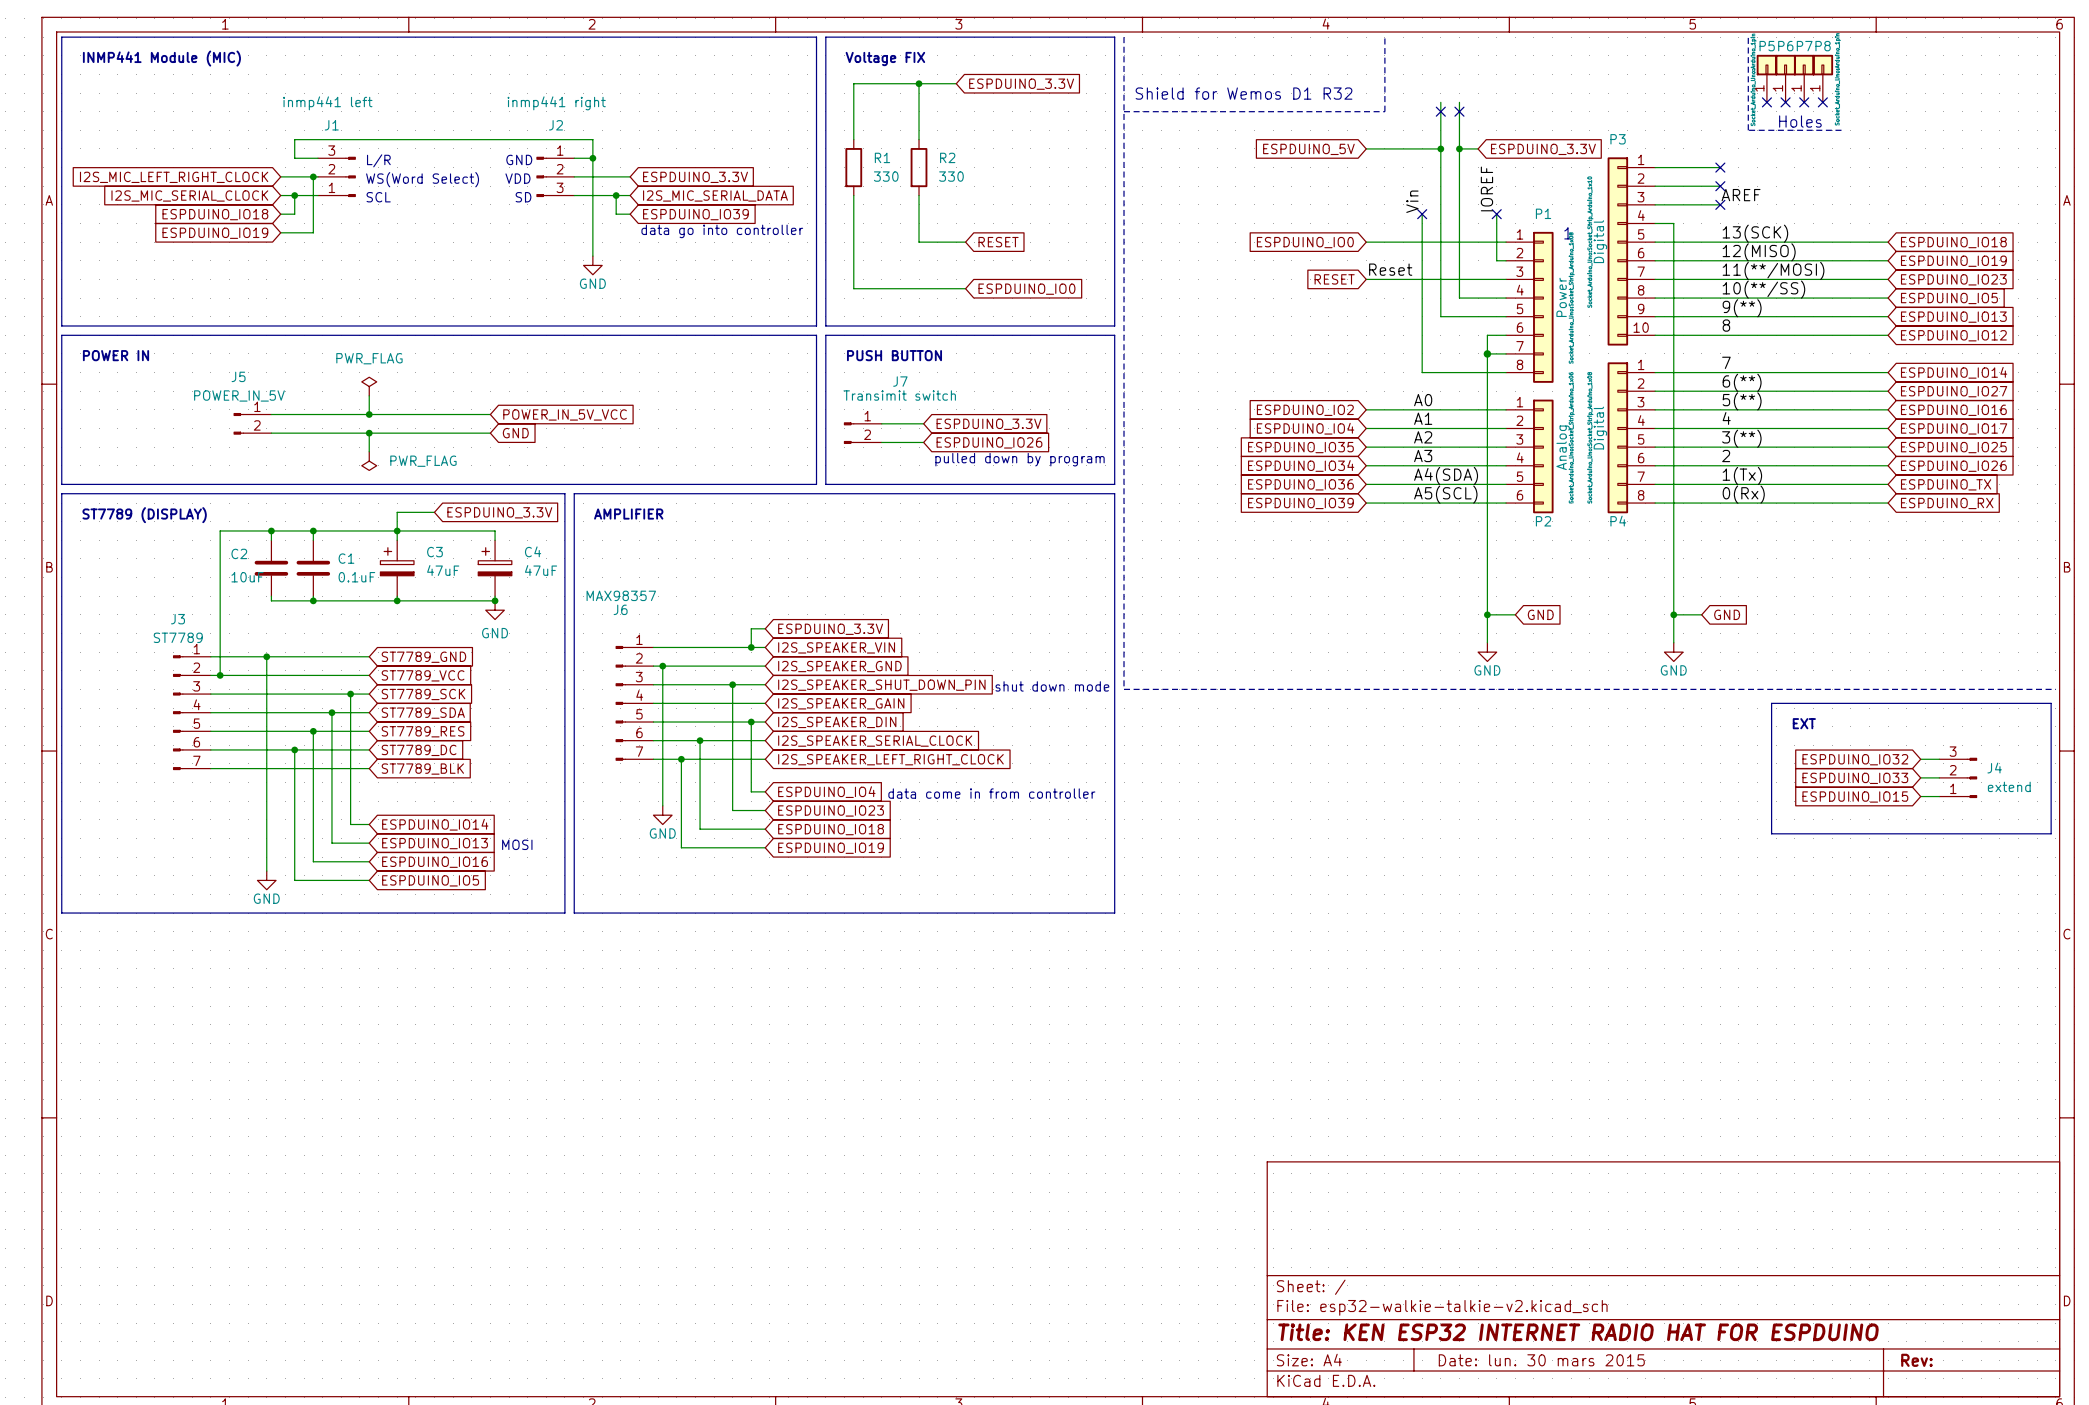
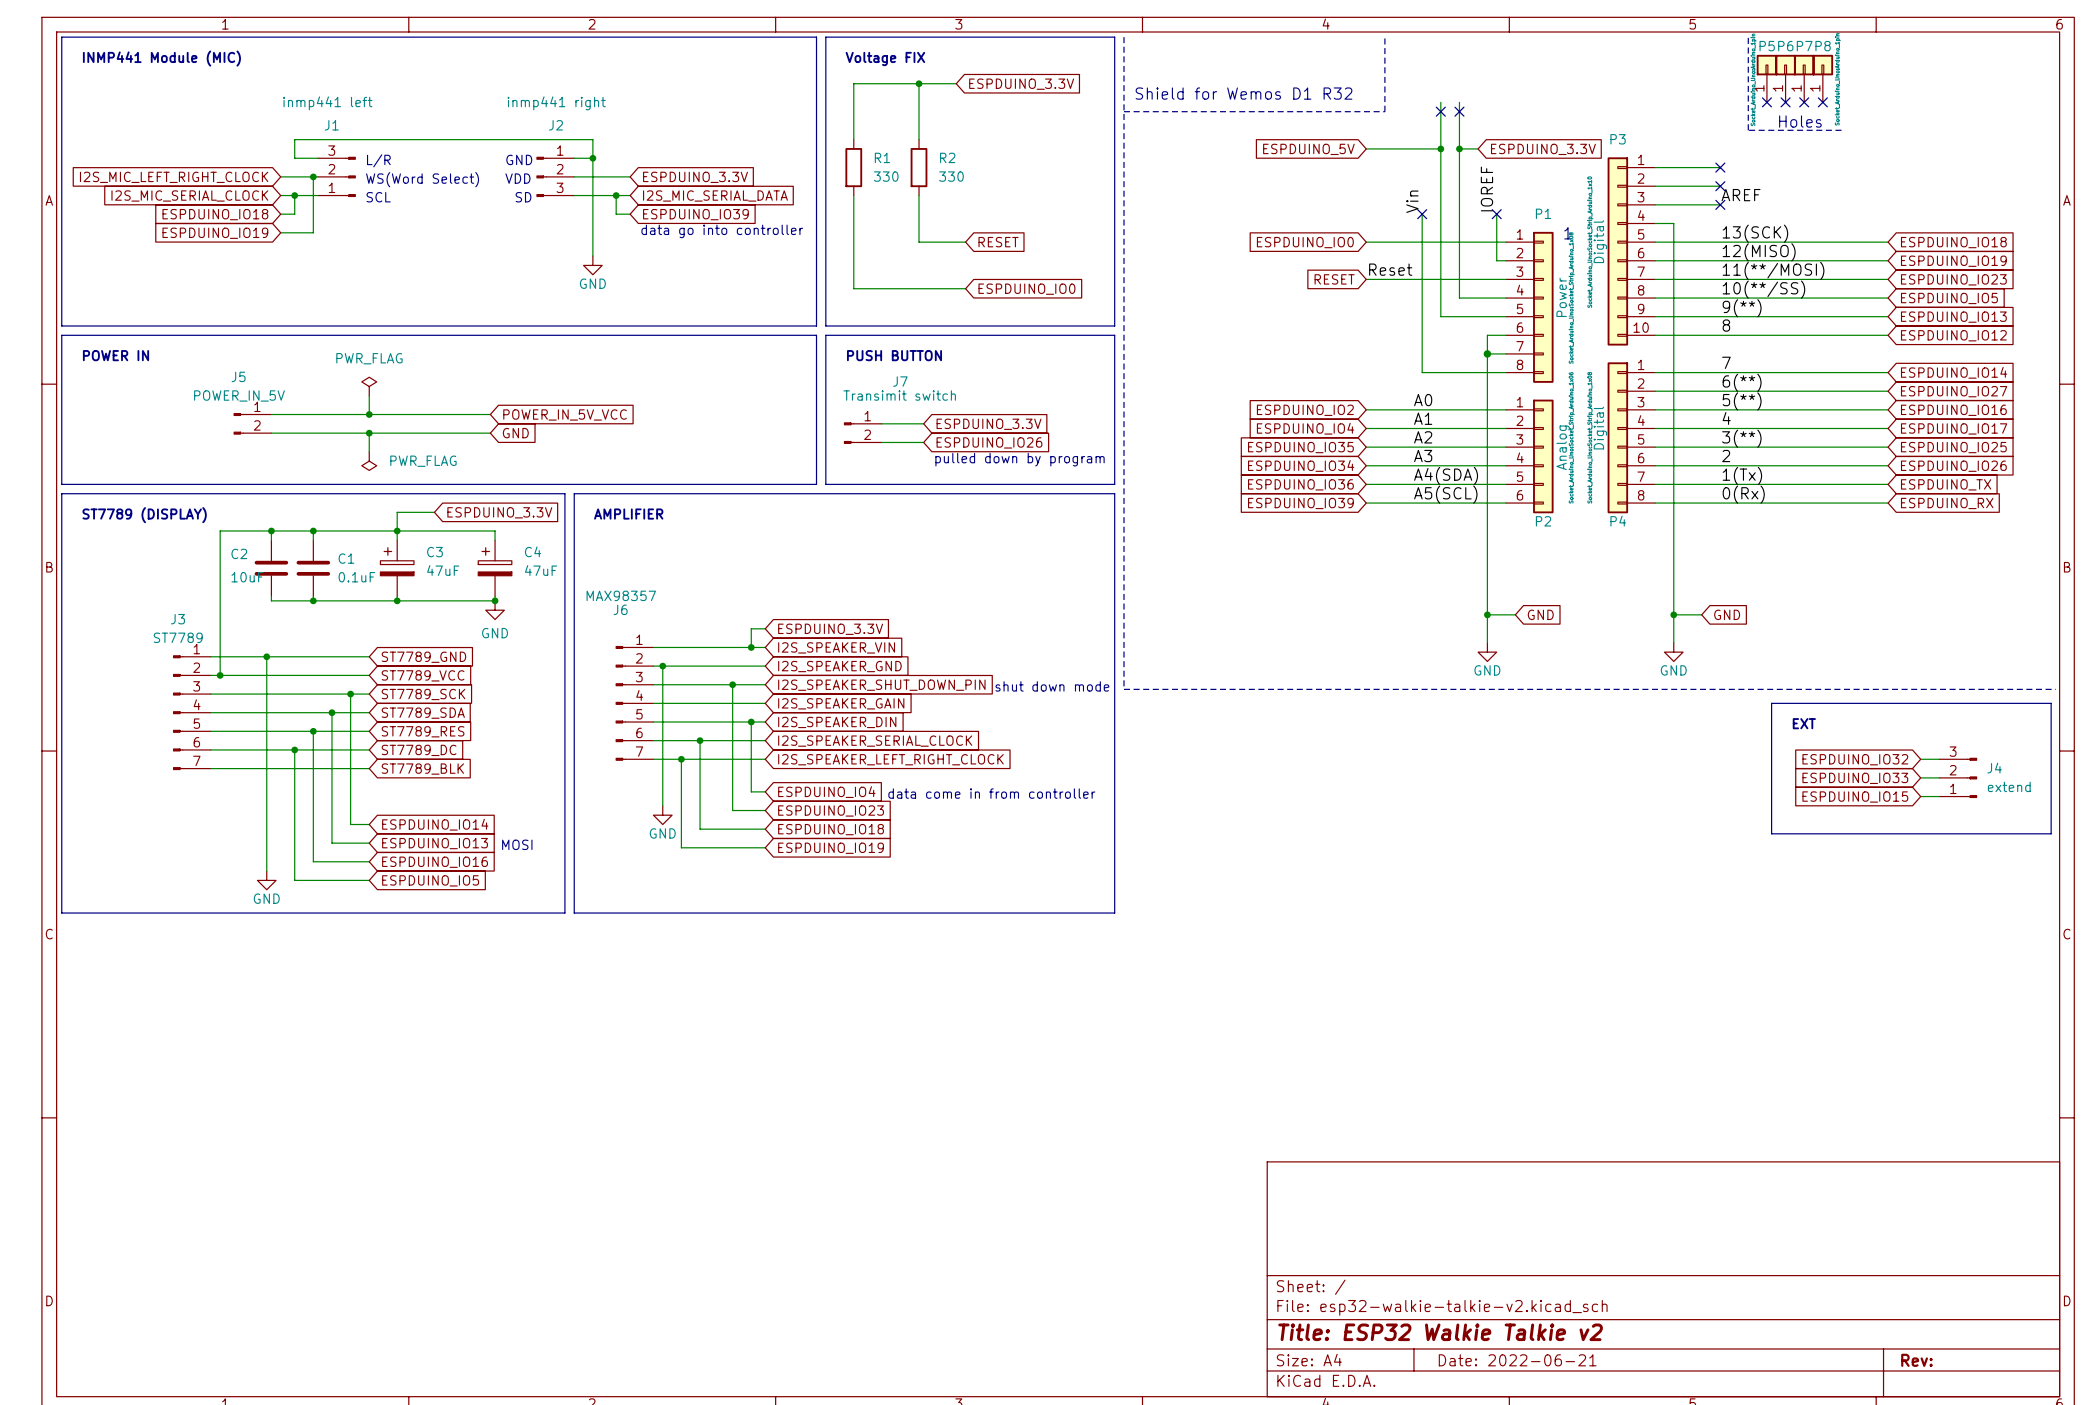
title block: Title: KEN ESP32 INTERNET RADIO HAT FOR ESPDUINO (1578, 1332) -> Title: ESP32 Walkie Talkie v2 (1440, 1332)
title block: Date: lun. 30 mars 2015 (1541, 1360) -> Date: 2022-06-21 (1517, 1360)

